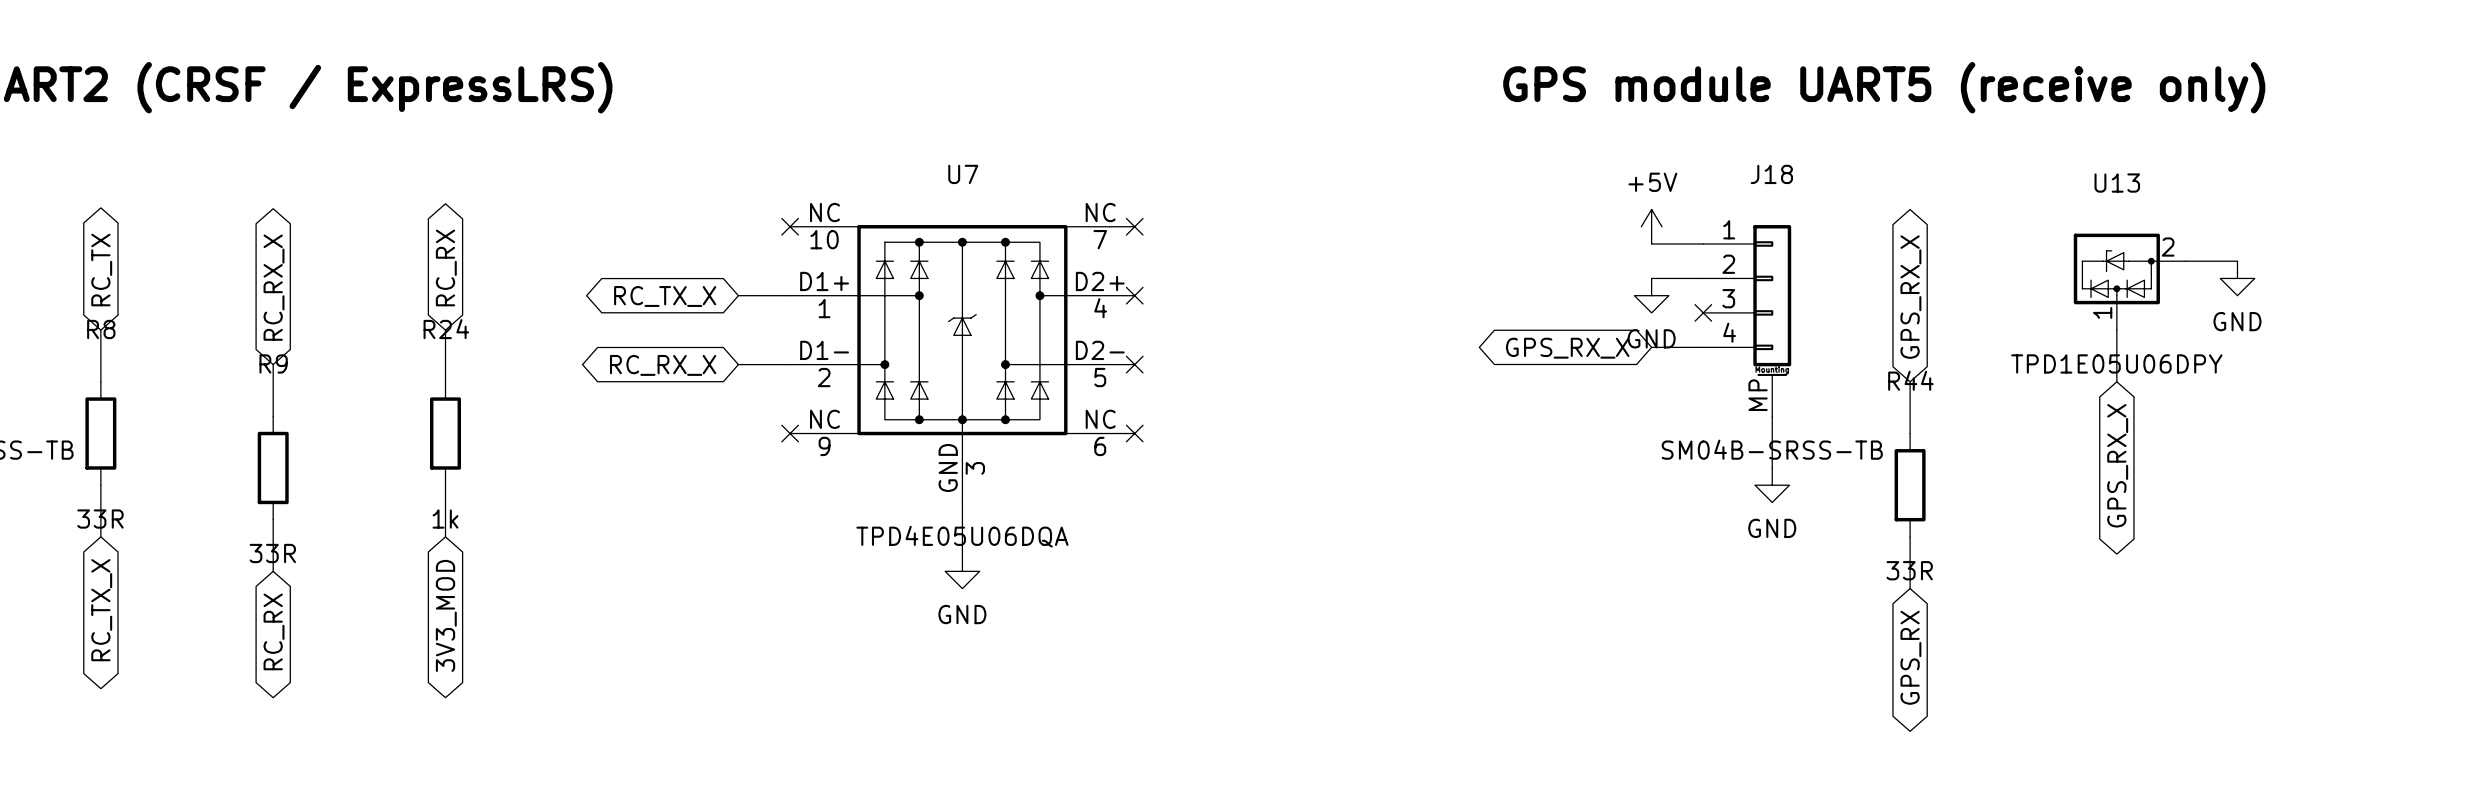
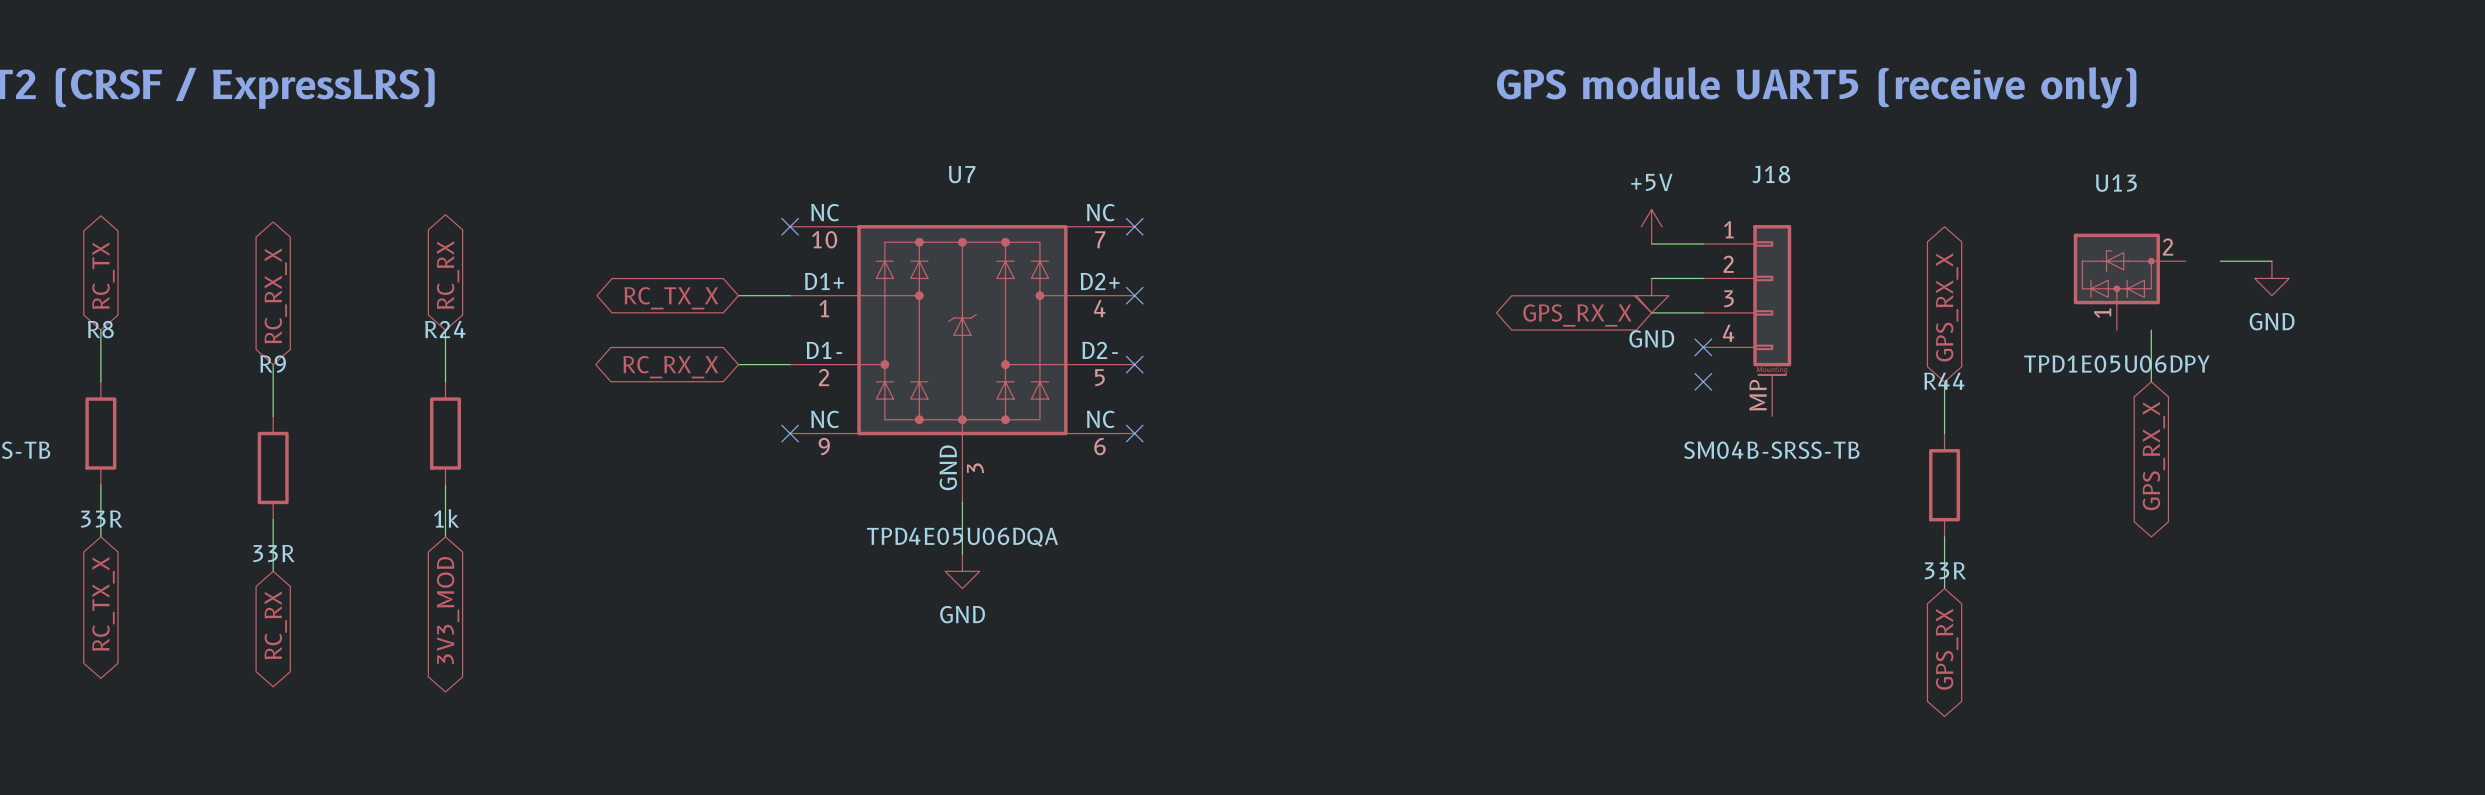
wire: (2185, 261) (2220, 261) -> (2237, 261) (2271, 261)
power symbol position: GND (2237, 278) -> GND (2271, 278)
global label position: GPS_RX_X (1910, 297) -> GPS_RX_X (1947, 307)
no-connect mark: (1703, 312) -> none
wire: (2116, 330) (2116, 381) -> (2151, 330) (2151, 381)
wire: (1651, 347) (1703, 347) -> (1651, 312) (1703, 312)
no-connect mark: none -> (1703, 347)
global label position: GPS_RX_X (1567, 348) -> GPS_RX_X (1577, 315)
no-connect mark: none -> (1703, 381)
wire: (1910, 381) (1910, 433) -> (1944, 381) (1944, 433)
wire: (1772, 416) (1772, 467) -> none
global label position: GPS_RX_X (2117, 465) -> GPS_RX_X (2153, 456)
power symbol: GND (1772, 485) -> none
R44 position: (1910, 485) -> (1944, 485)
wire: (1910, 536) (1910, 588) -> (1944, 536) (1944, 588)
global label position: GPS_RX (1910, 657) -> GPS_RX (1947, 649)

